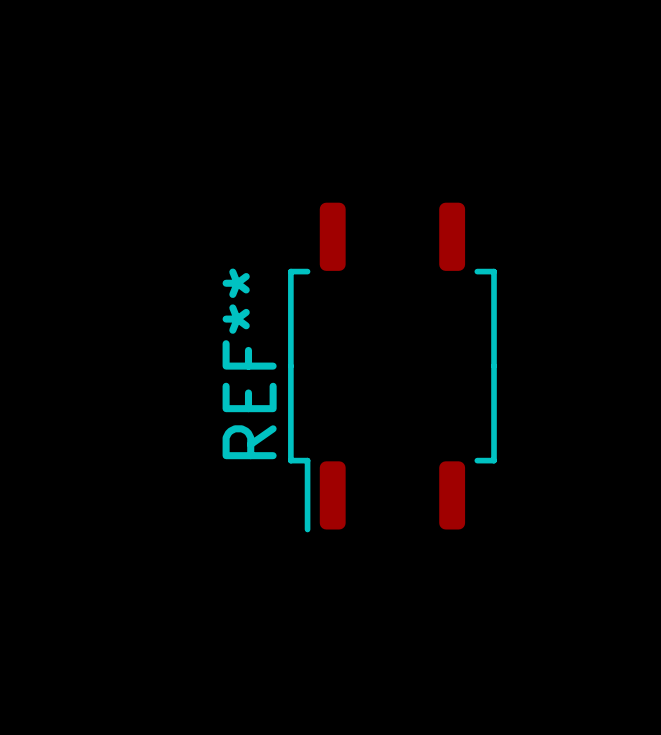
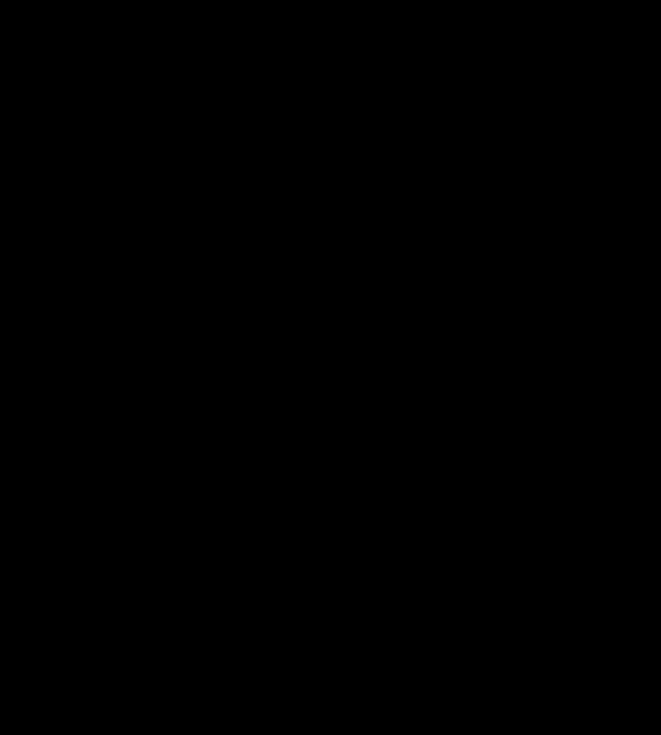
REF**: (392, 367) -> none

